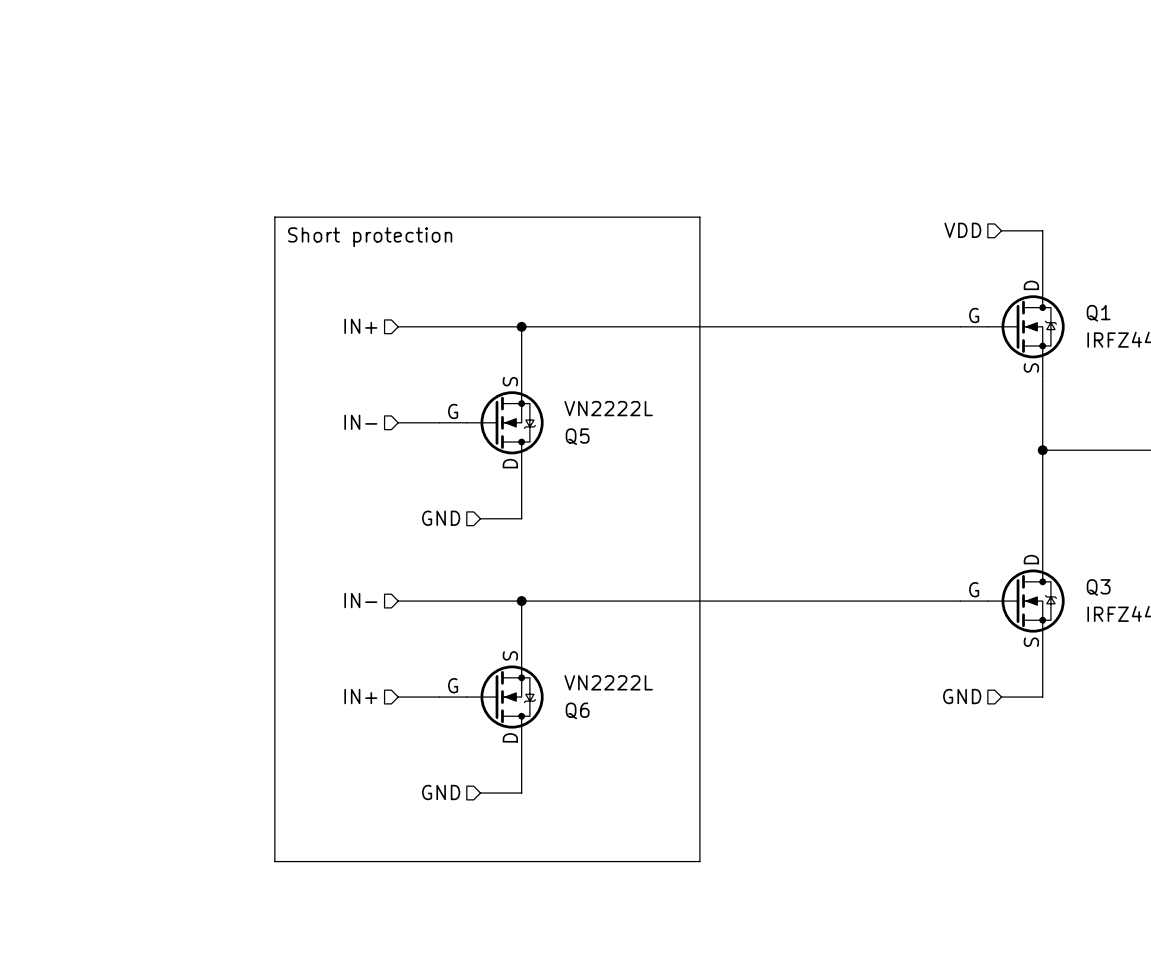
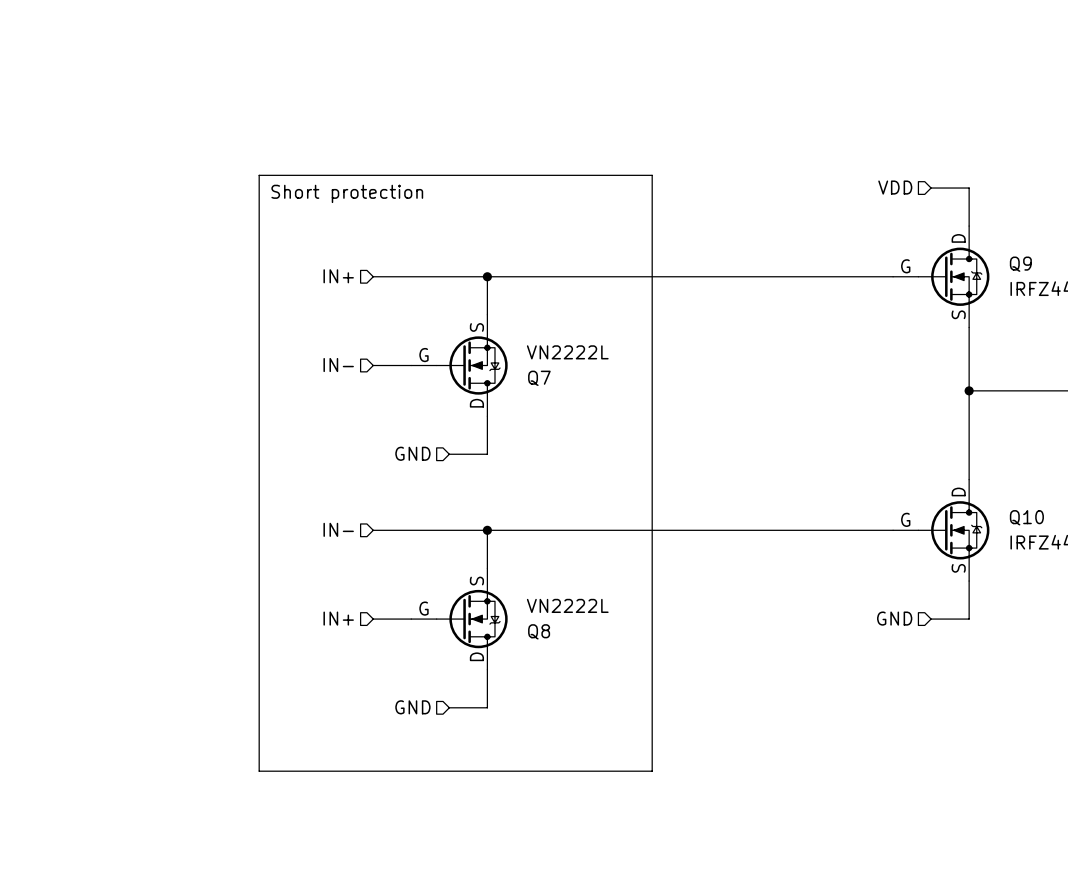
Q1 name: Q1 (1098, 313) -> Q9 (1020, 264)
Q5 name: Q5 (577, 436) -> Q7 (539, 378)
Q3 name: Q3 (1098, 587) -> Q10 (1026, 517)
Q6 name: Q6 (577, 710) -> Q8 (539, 631)

